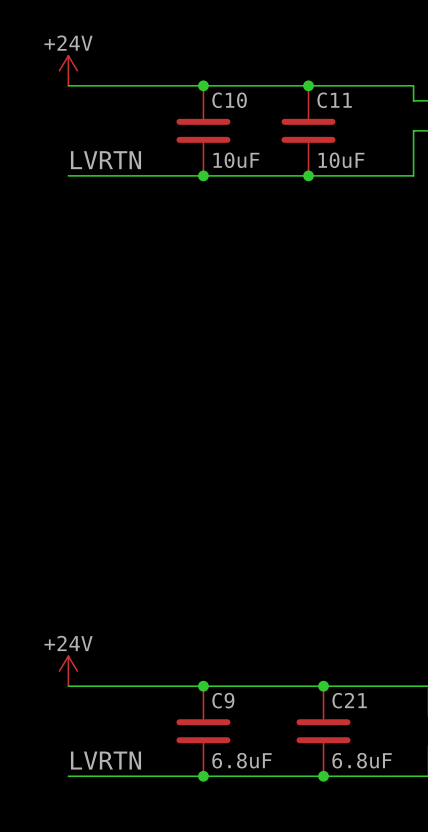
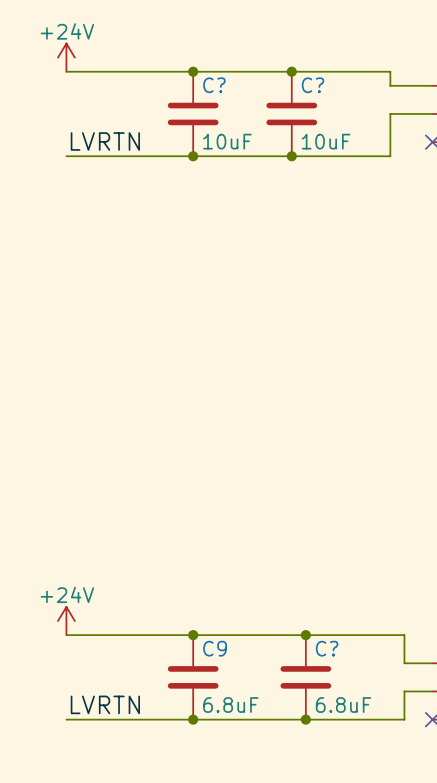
C10 name: C10 (229, 100) -> C? (214, 85)
C11 name: C11 (334, 100) -> C? (313, 85)
C21 name: C21 (349, 700) -> C? (327, 648)

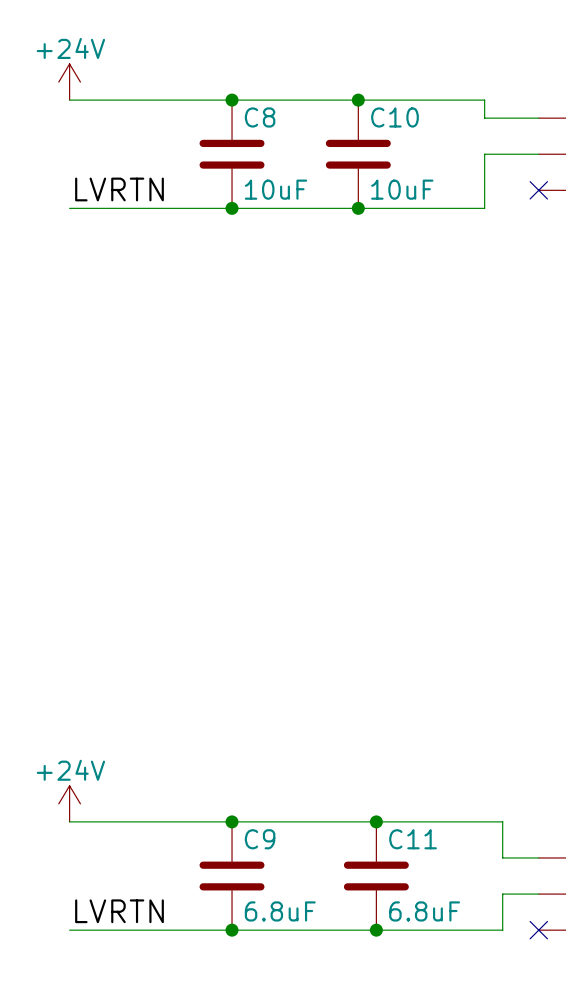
C? name: C? (214, 85) -> C8 (260, 117)
C? name: C? (313, 85) -> C10 (394, 117)
C? name: C? (327, 648) -> C11 (413, 839)

